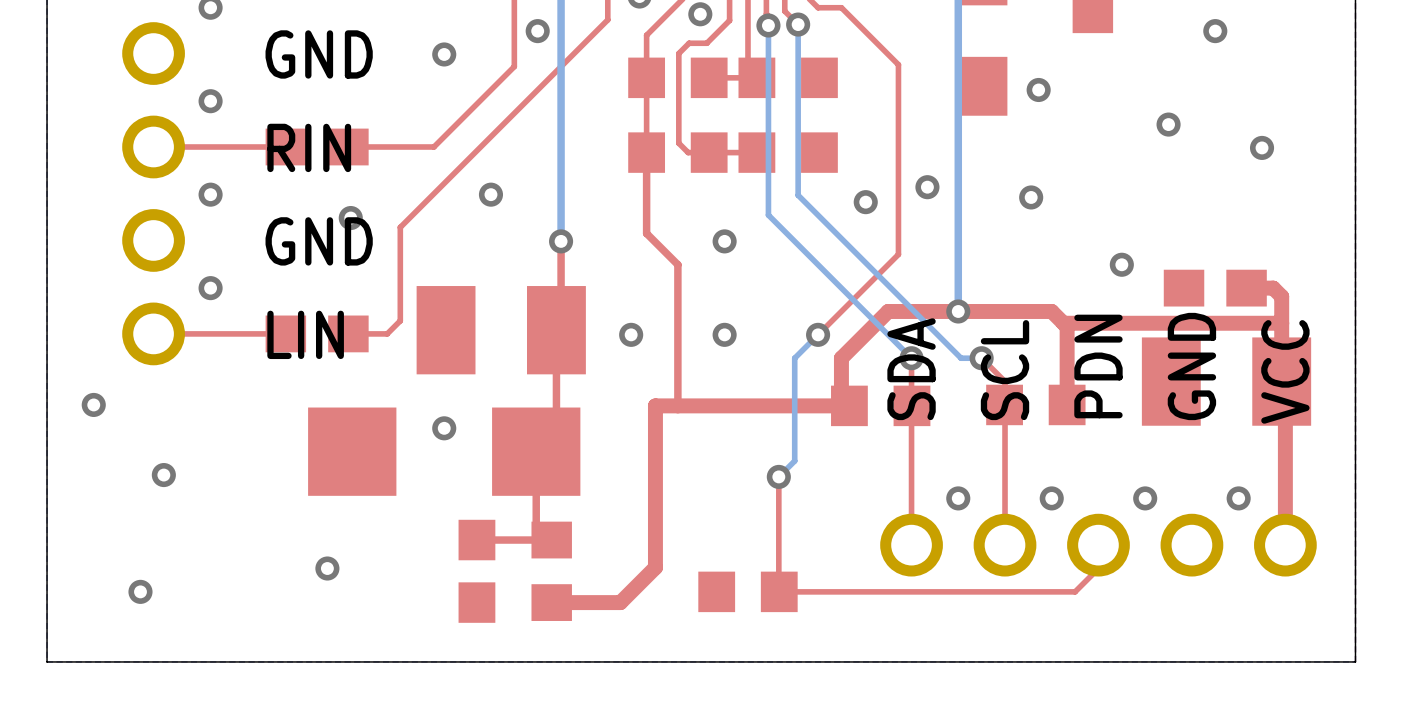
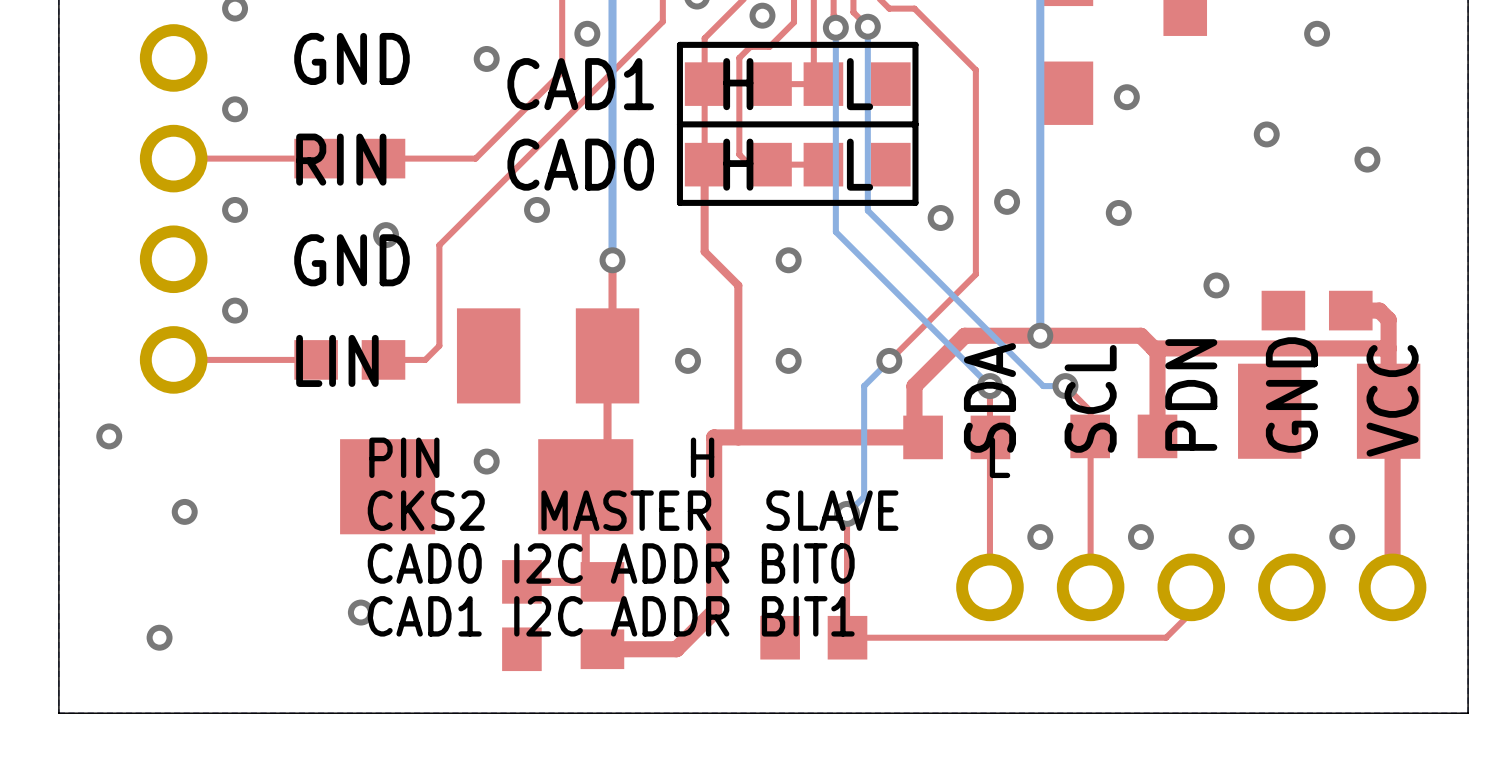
line: none -> (915, 44) (915, 202) (679, 202) (679, 44) (915, 44)
text: none -> CAD1 (580, 84)
text: none -> H (738, 84)
text: none -> L (860, 84)
line: none -> (915, 124) (679, 124)
text: none -> CAD0 (580, 164)
text: none -> H (738, 164)
text: none -> L (860, 164)
text: none -> PIN H L (689, 457)
text: none -> CKS2 MASTER SLAVE (633, 510)
text: none -> CAD0 I2C ADDR BIT0 (611, 563)
text: none -> CAD1 I2C ADDR BIT1 (611, 616)

